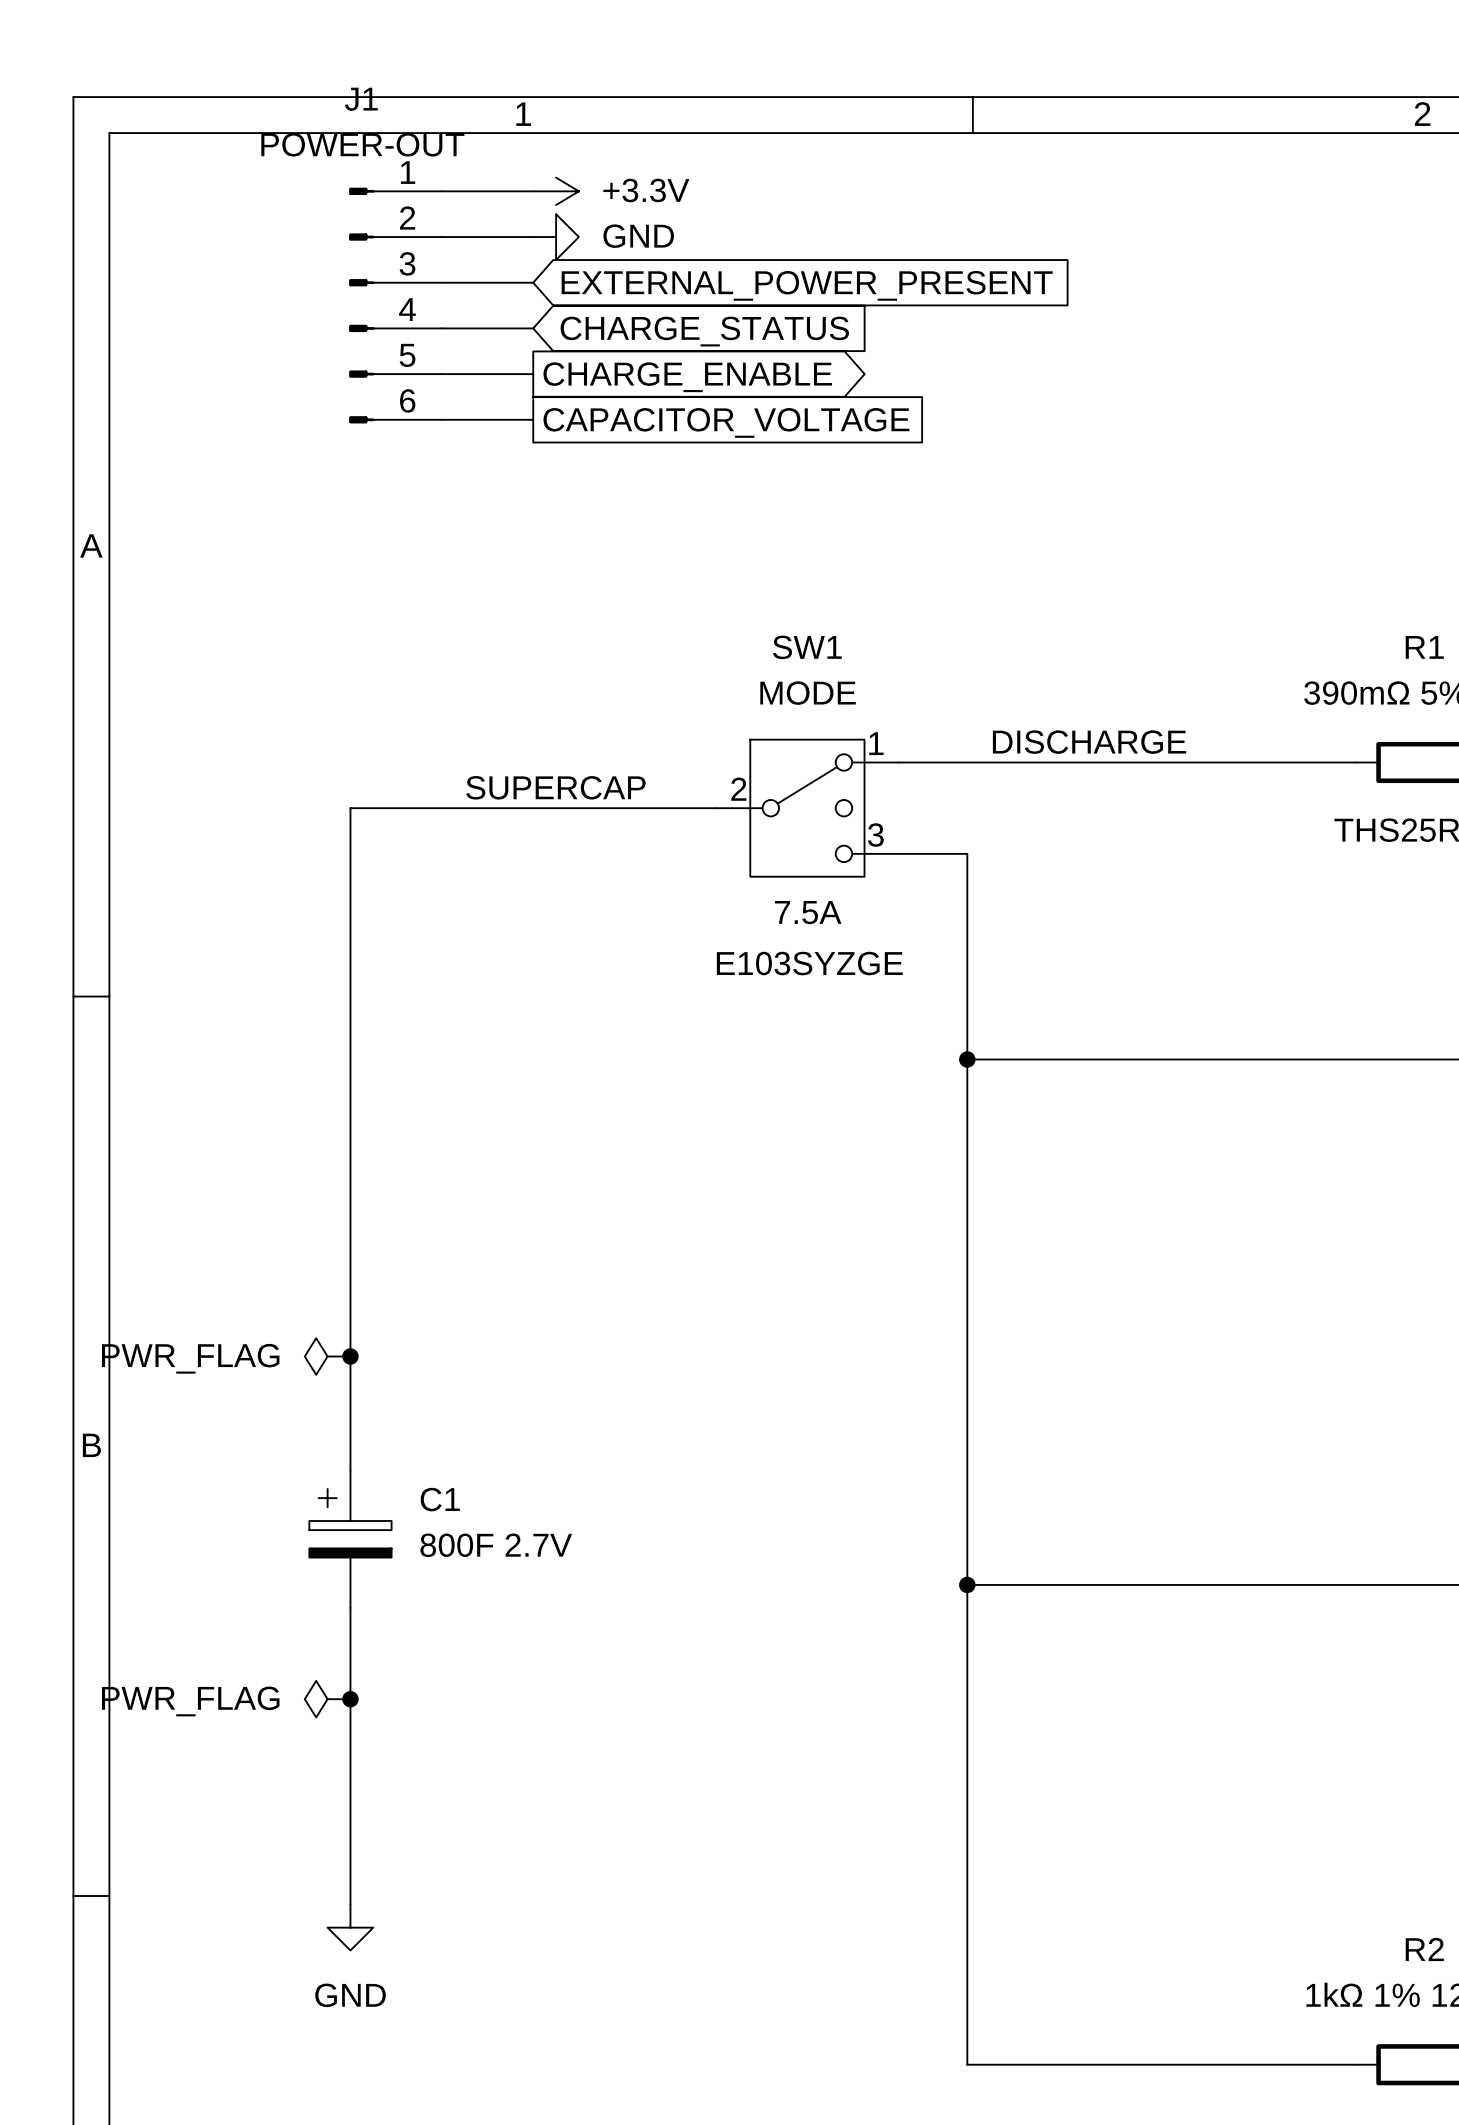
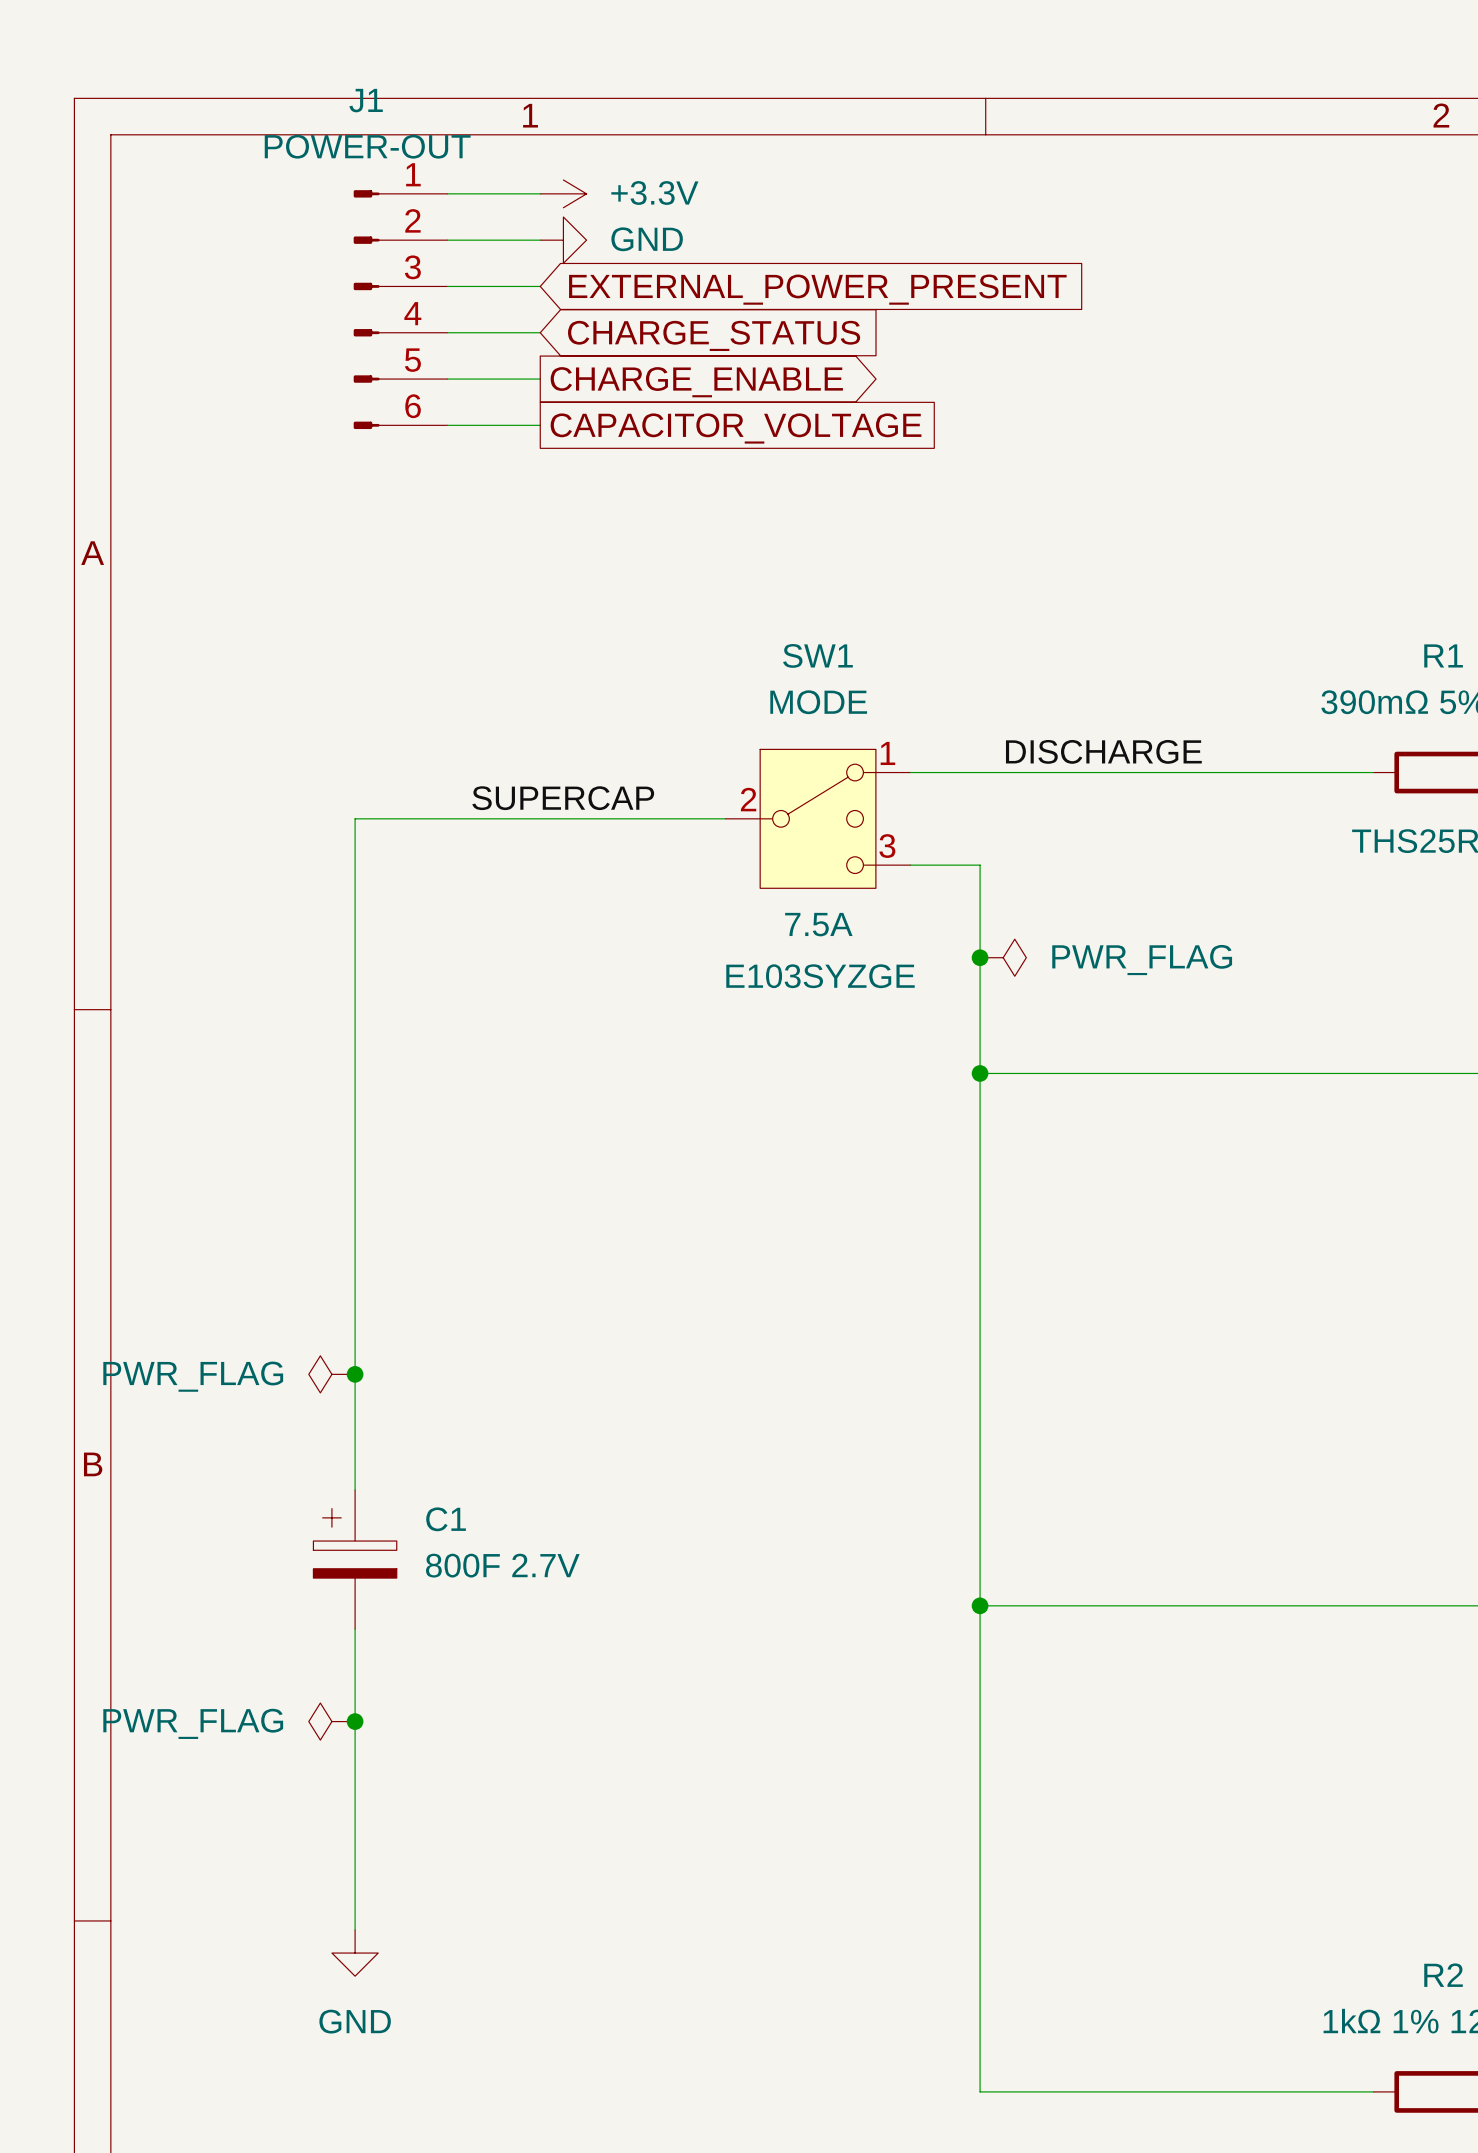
junction: none -> (980, 957)
power symbol: none -> PWR_FLAG (1003, 957)

